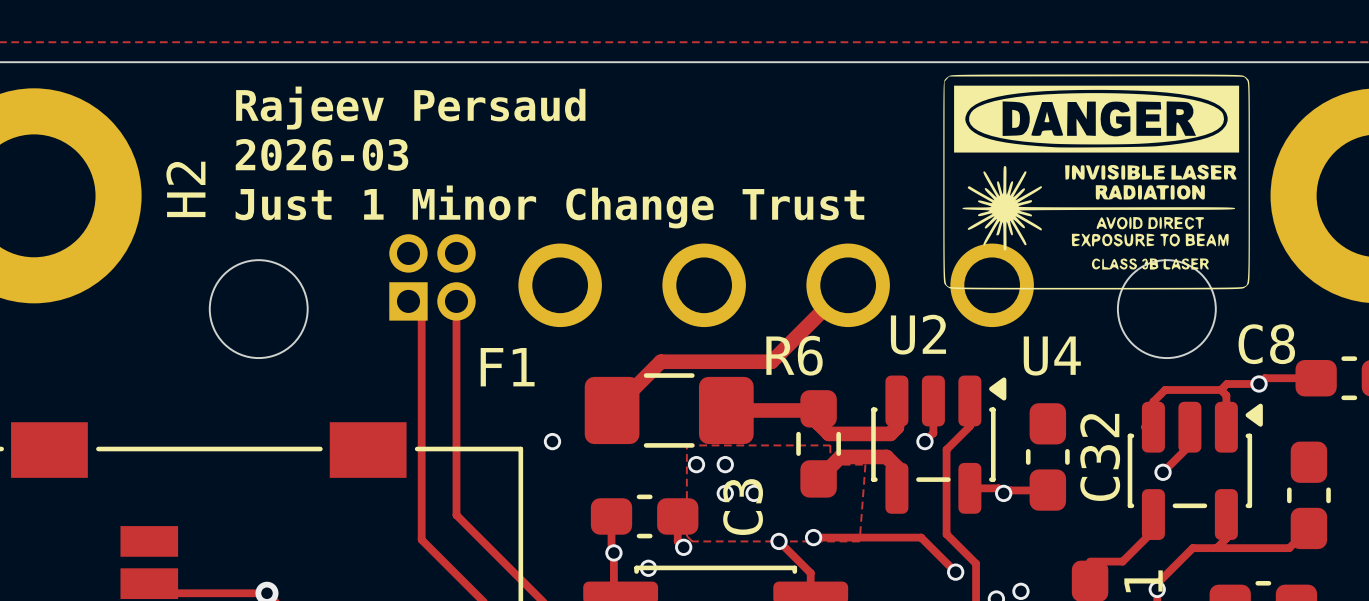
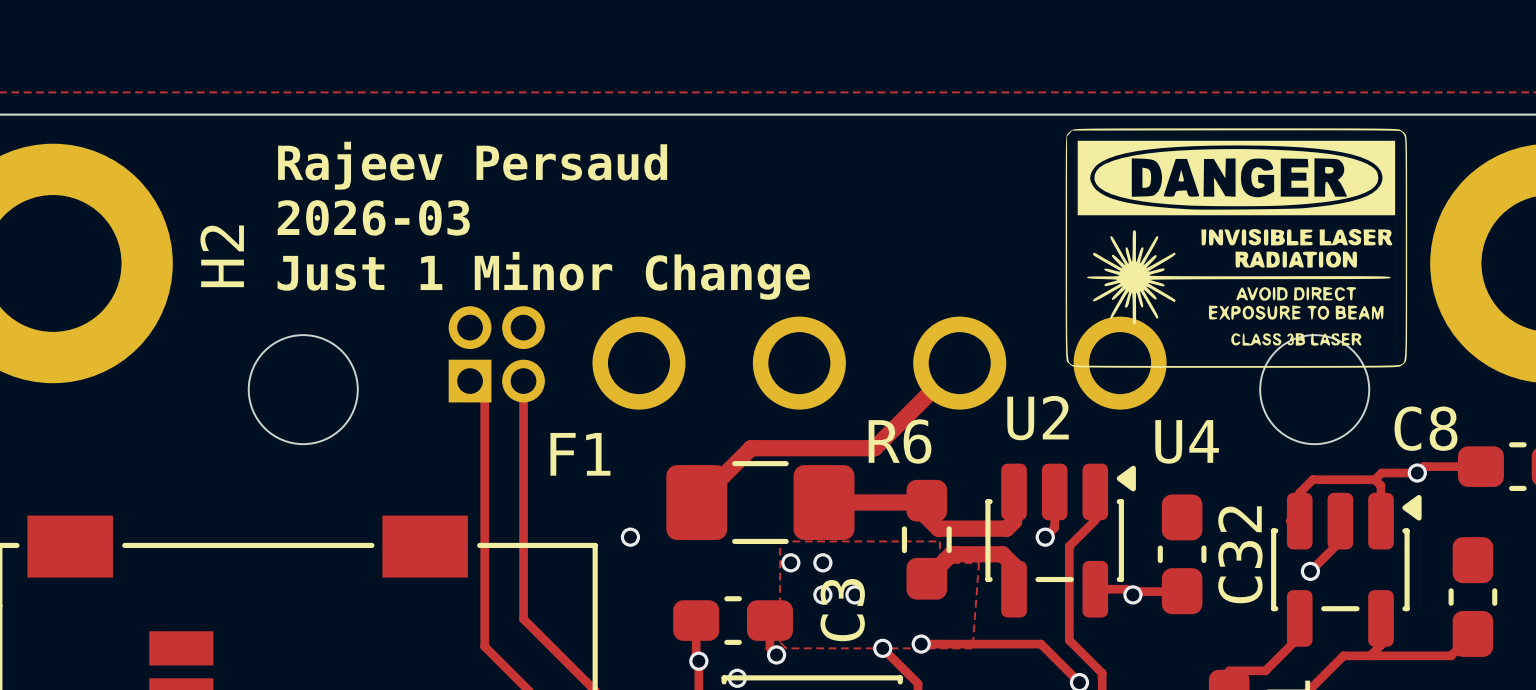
text: Just 1 Minor Change Trust (549, 206) -> Just 1 Minor Change (543, 275)

